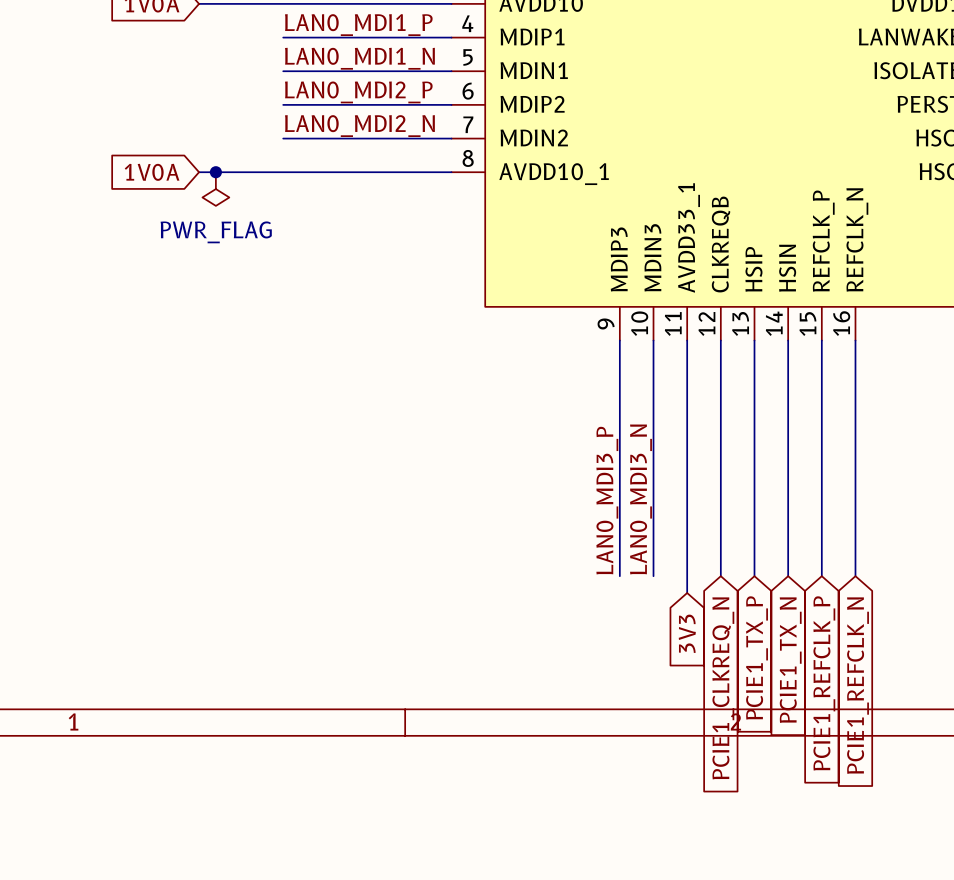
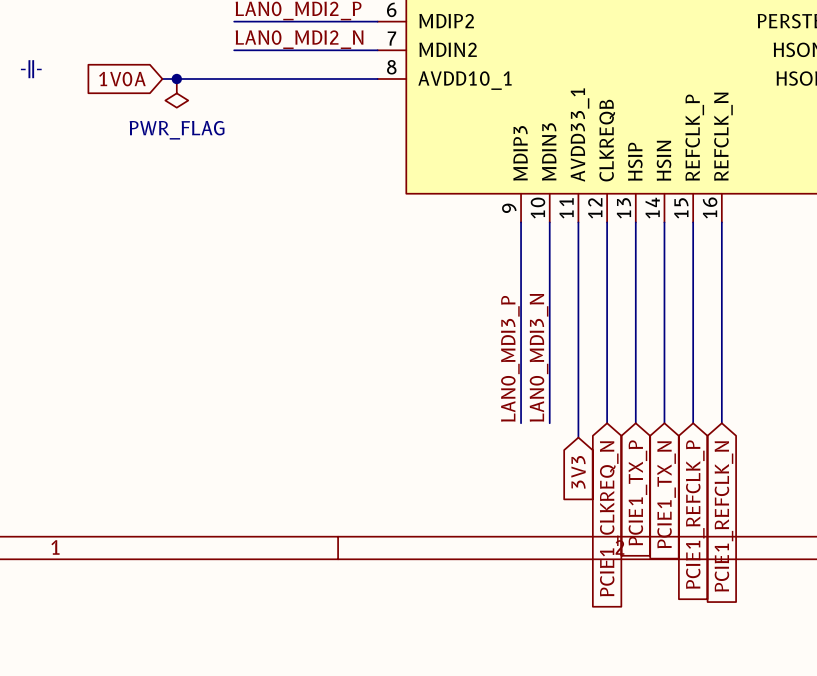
text: none -> -||- (31, 69)

